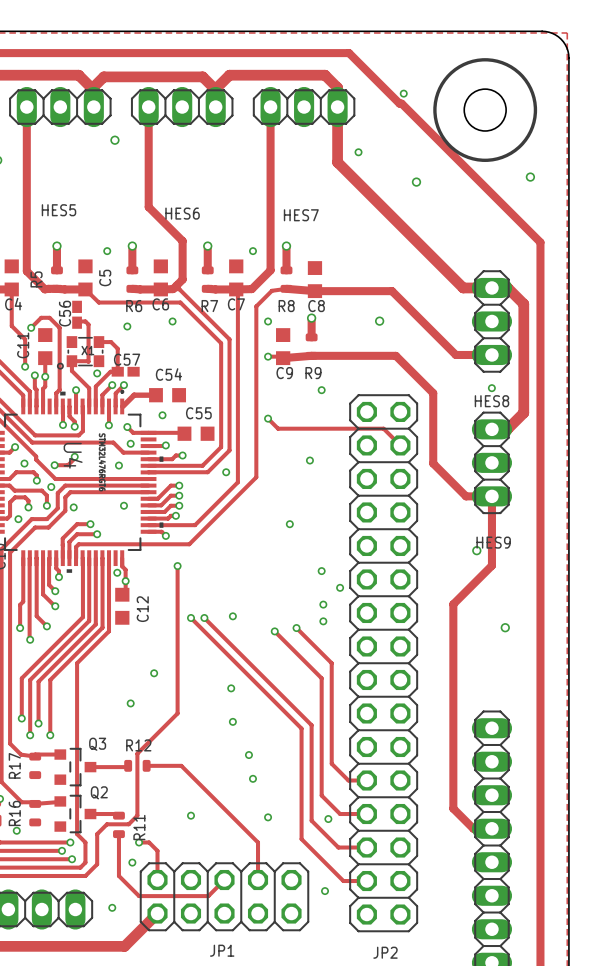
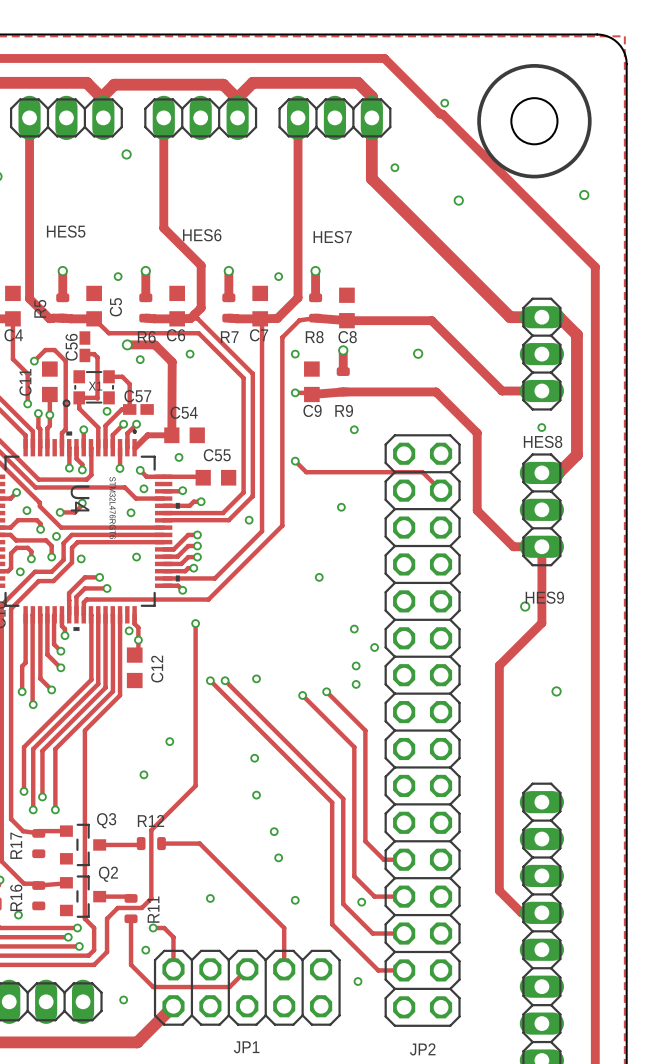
track: none -> (127, 344) (155, 344) (172, 362) (171, 435)
via: none -> (127, 344)

